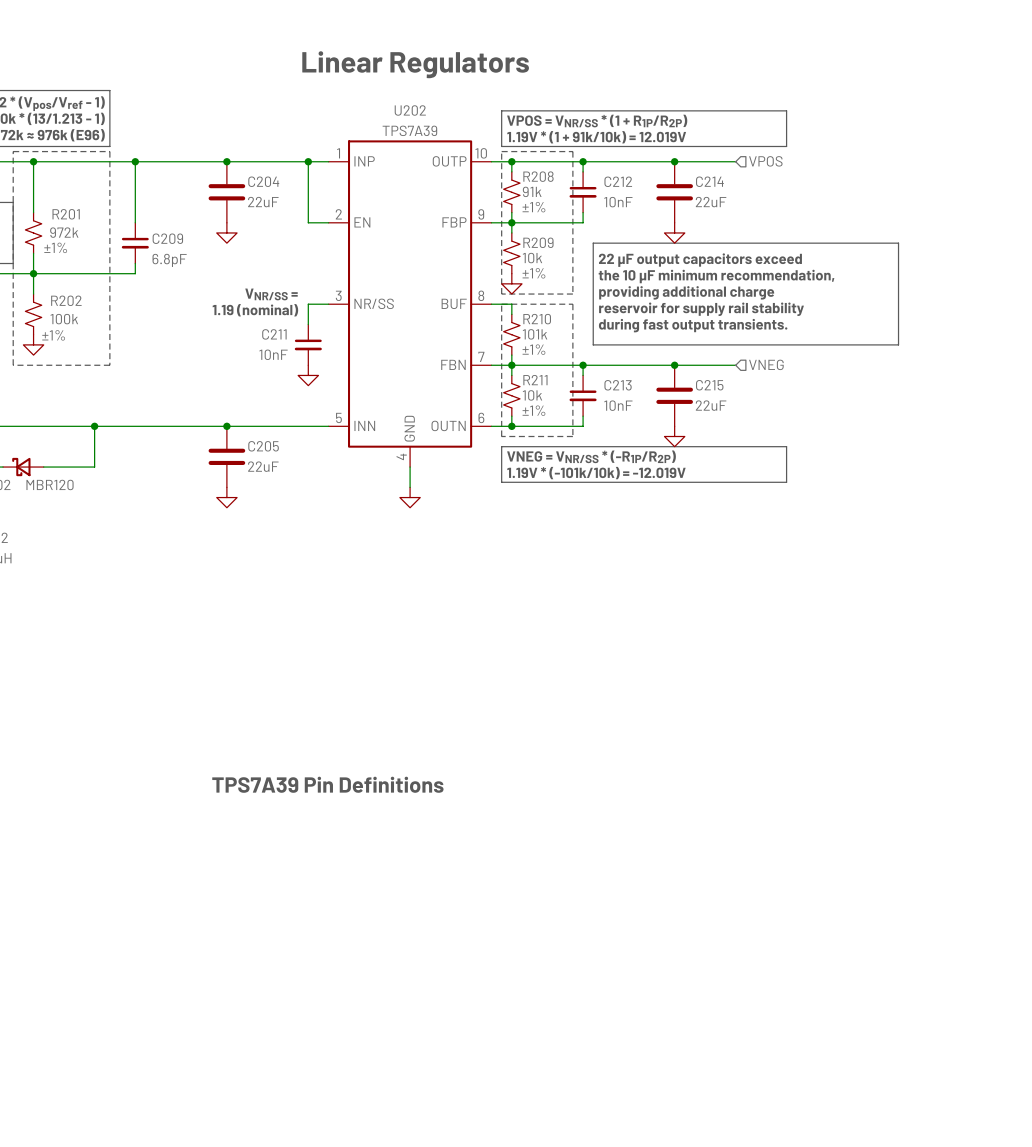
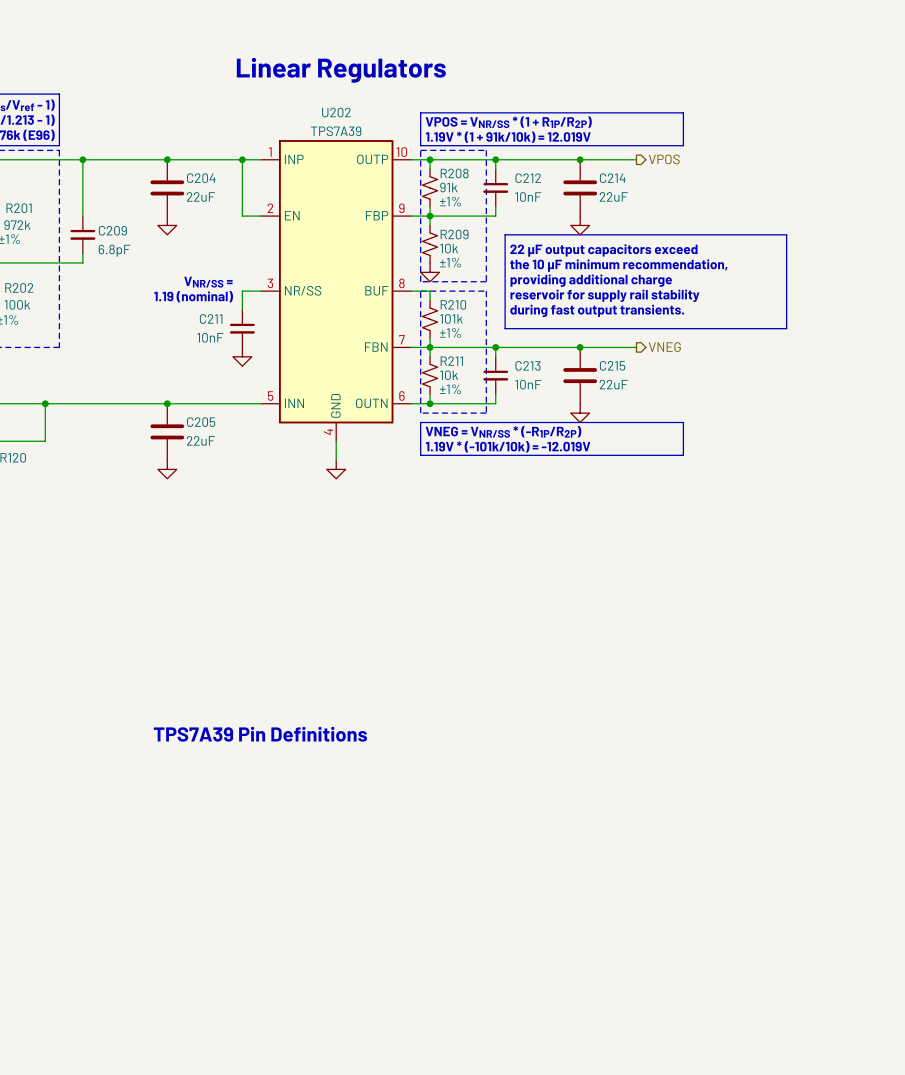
hierarchical label shape: input (765, 161) -> output (664, 159)
hierarchical label shape: input (766, 364) -> output (664, 347)

